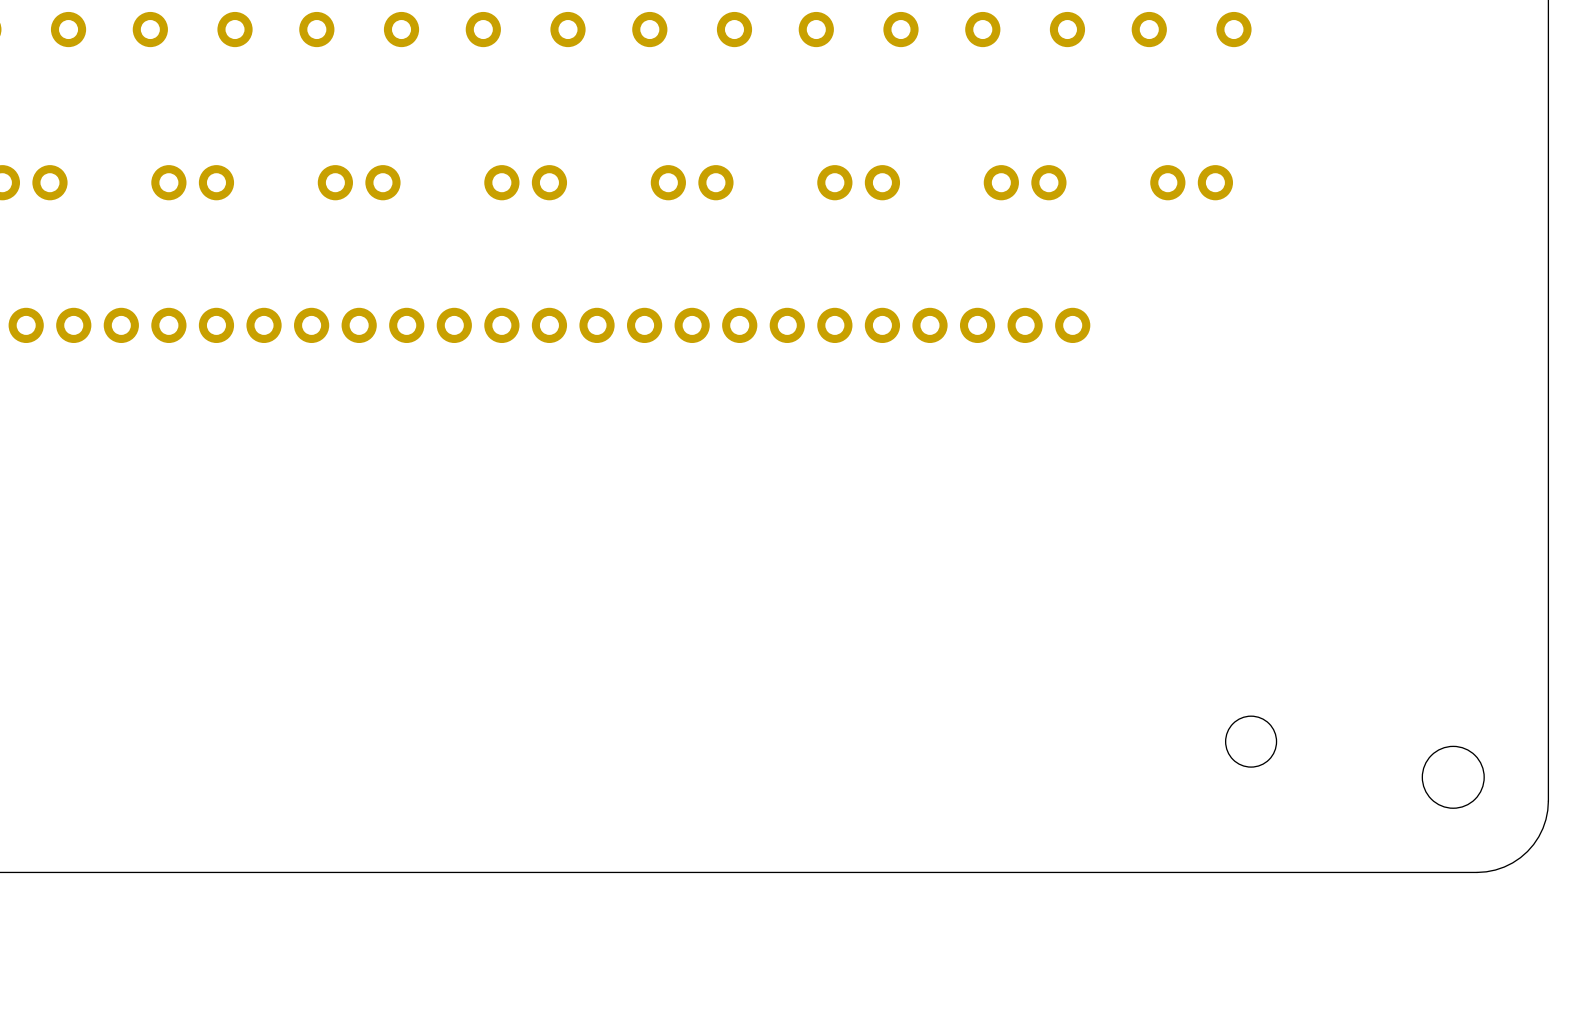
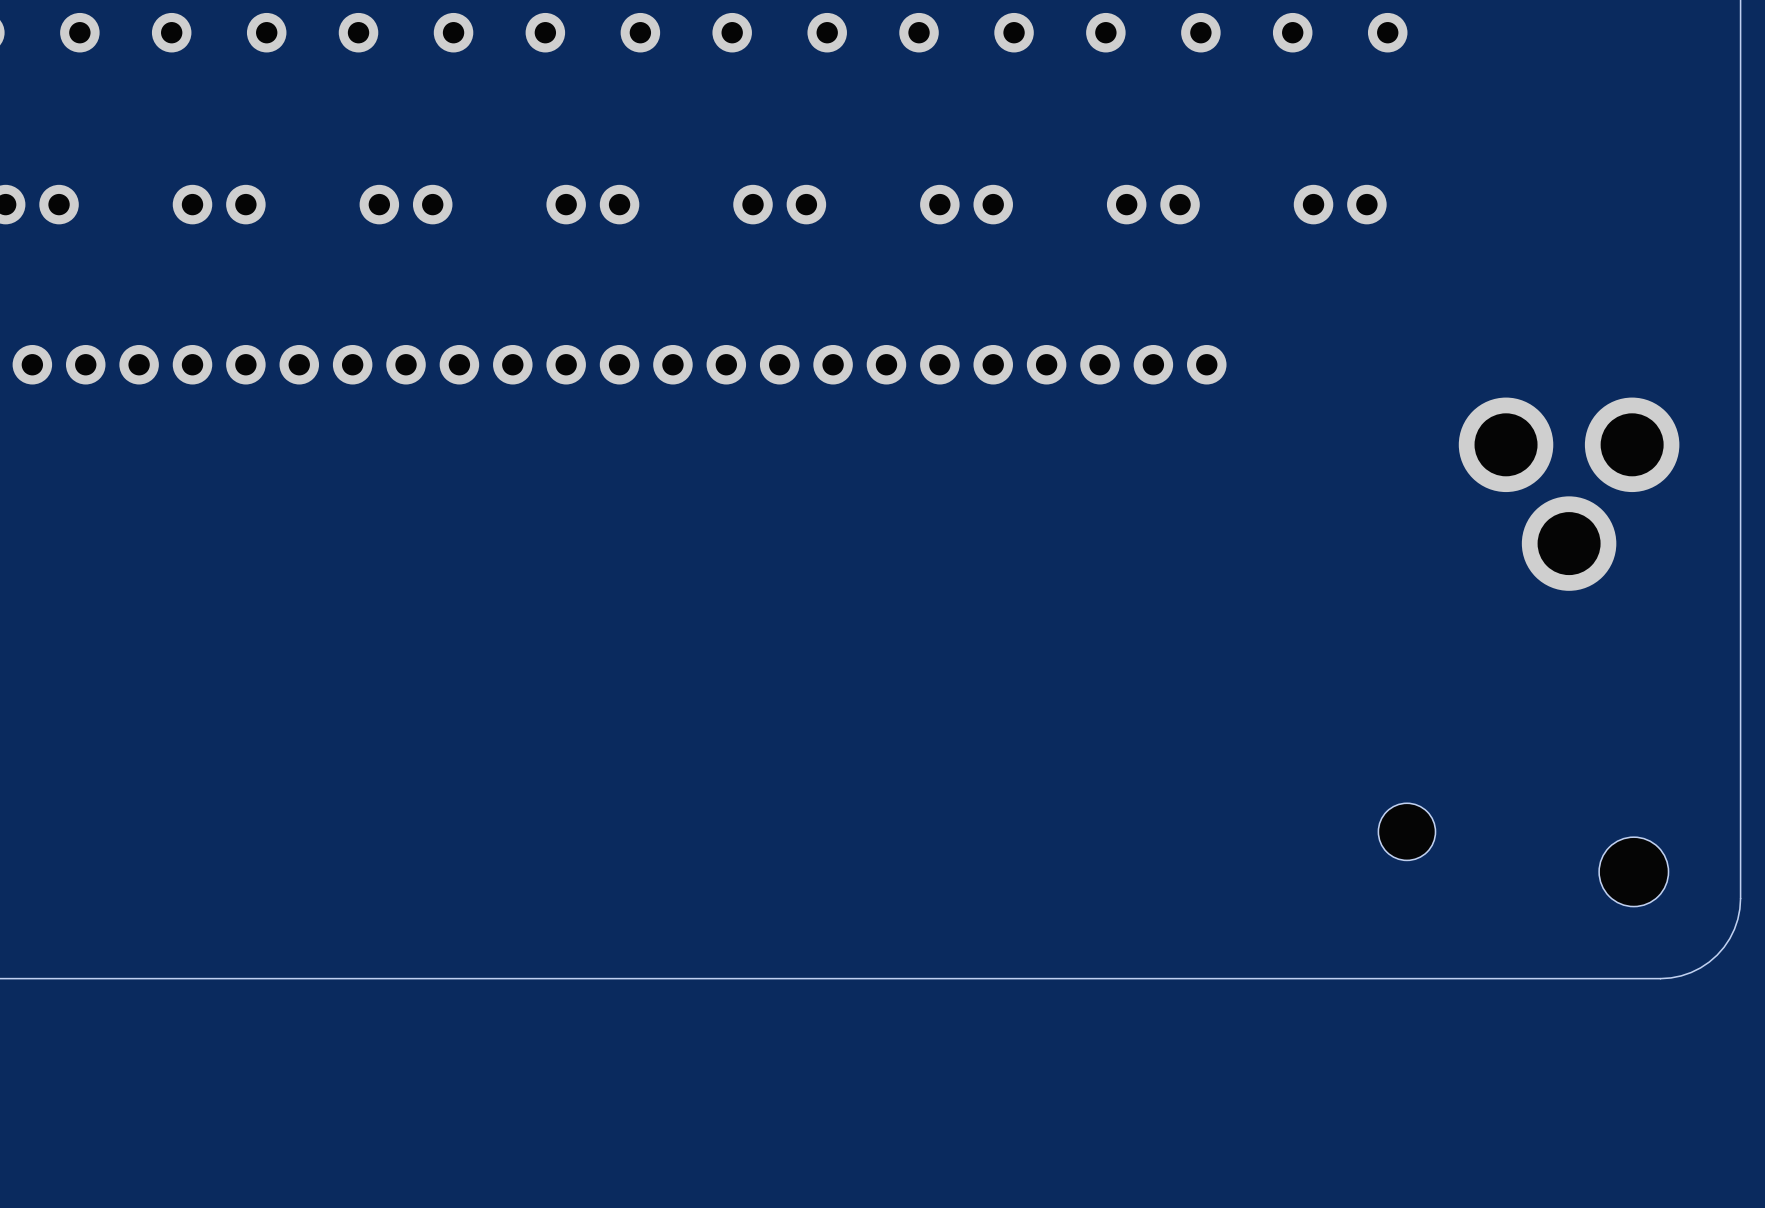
part: none -> (1569, 494)

